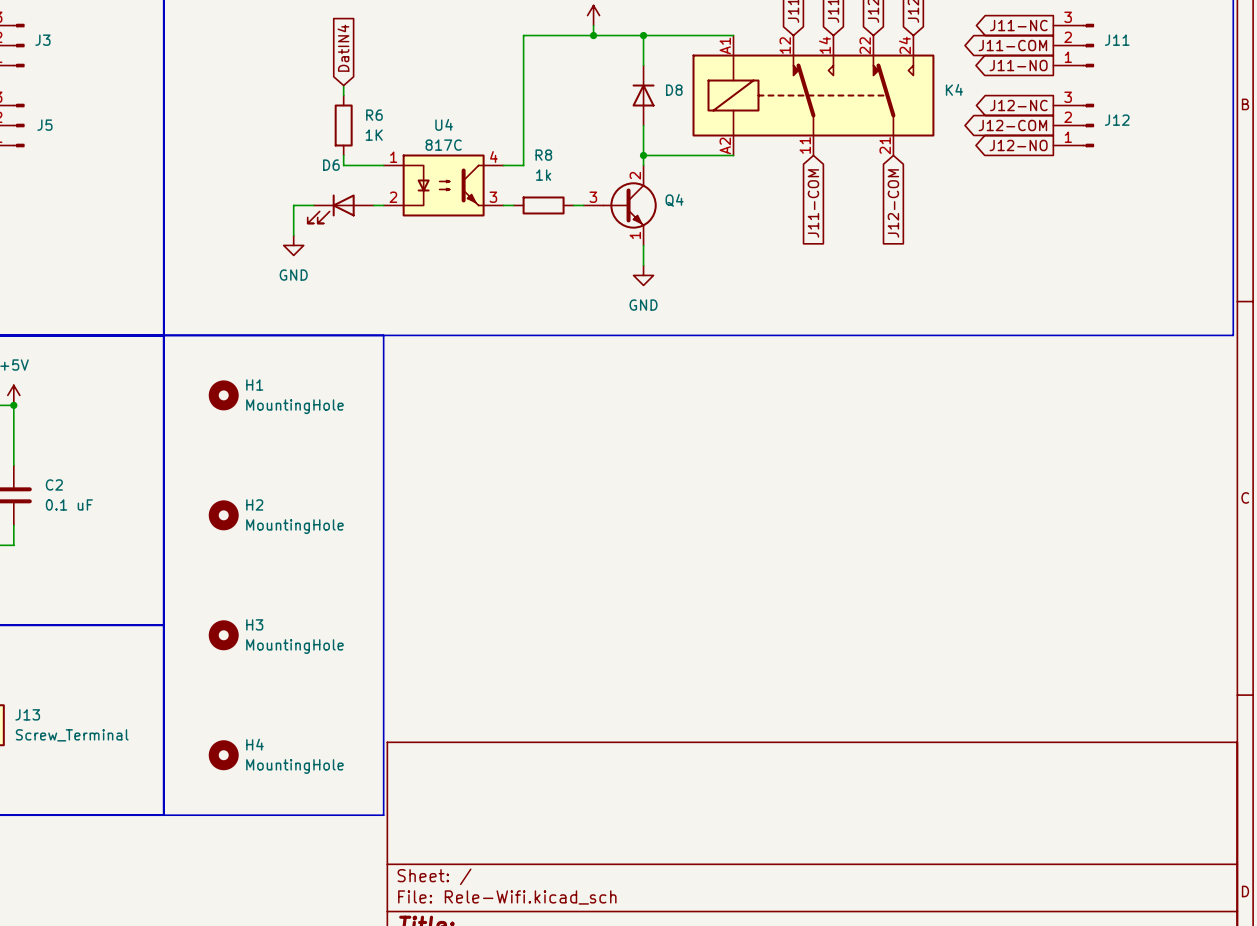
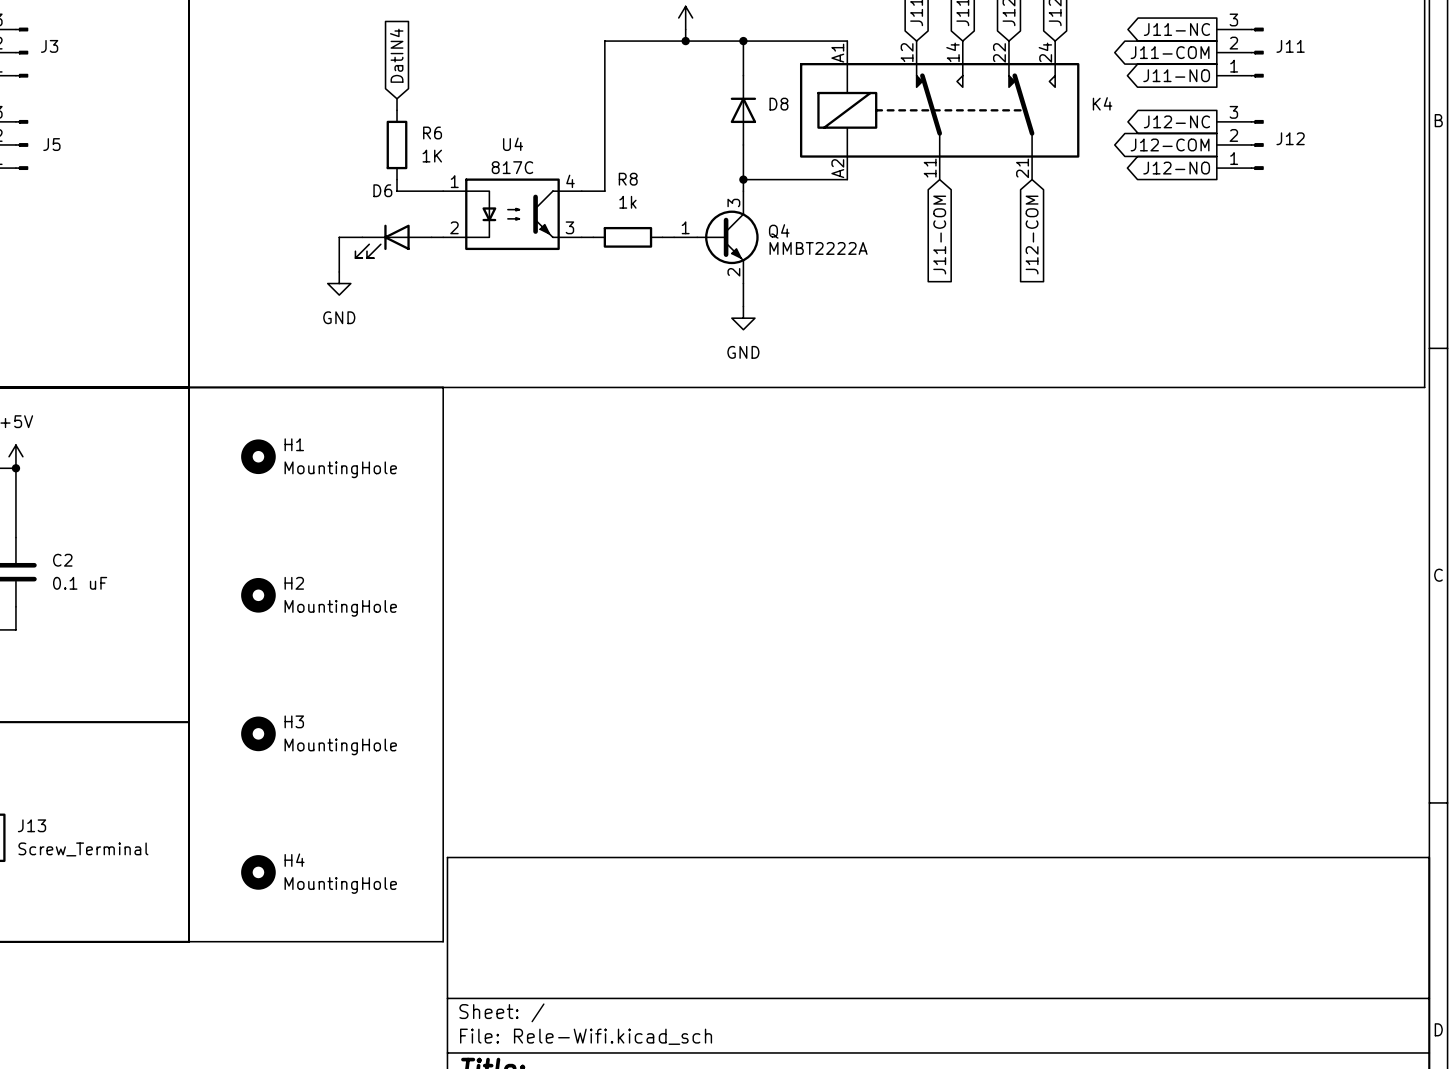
Q4 pin number: 2 (635, 175) -> 3 (733, 202)
Q4 pin number: 3 (593, 197) -> 1 (685, 227)
Q4 value: none -> MMBT2222A (818, 248)
Q4 pin number: 1 (635, 235) -> 2 (733, 272)

